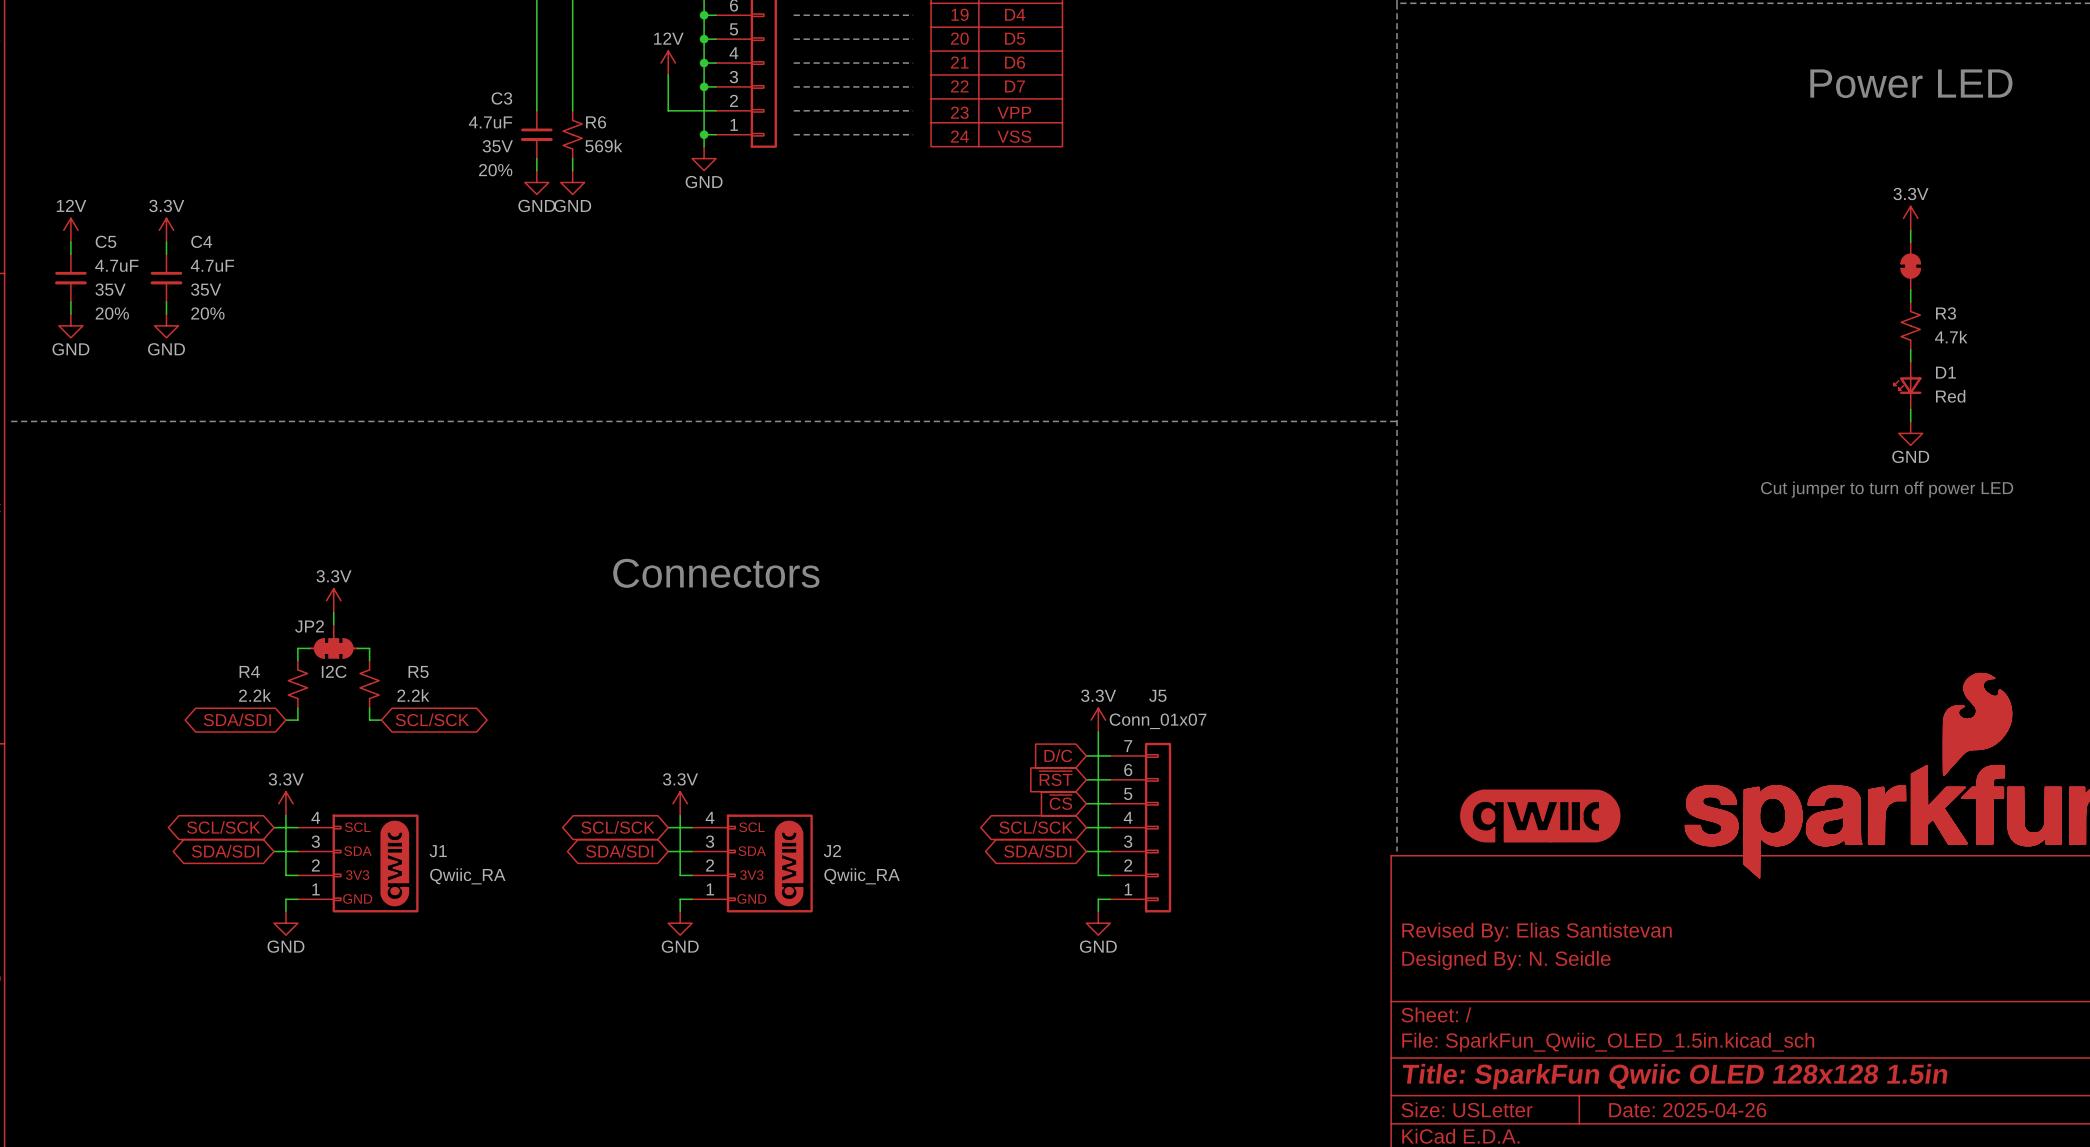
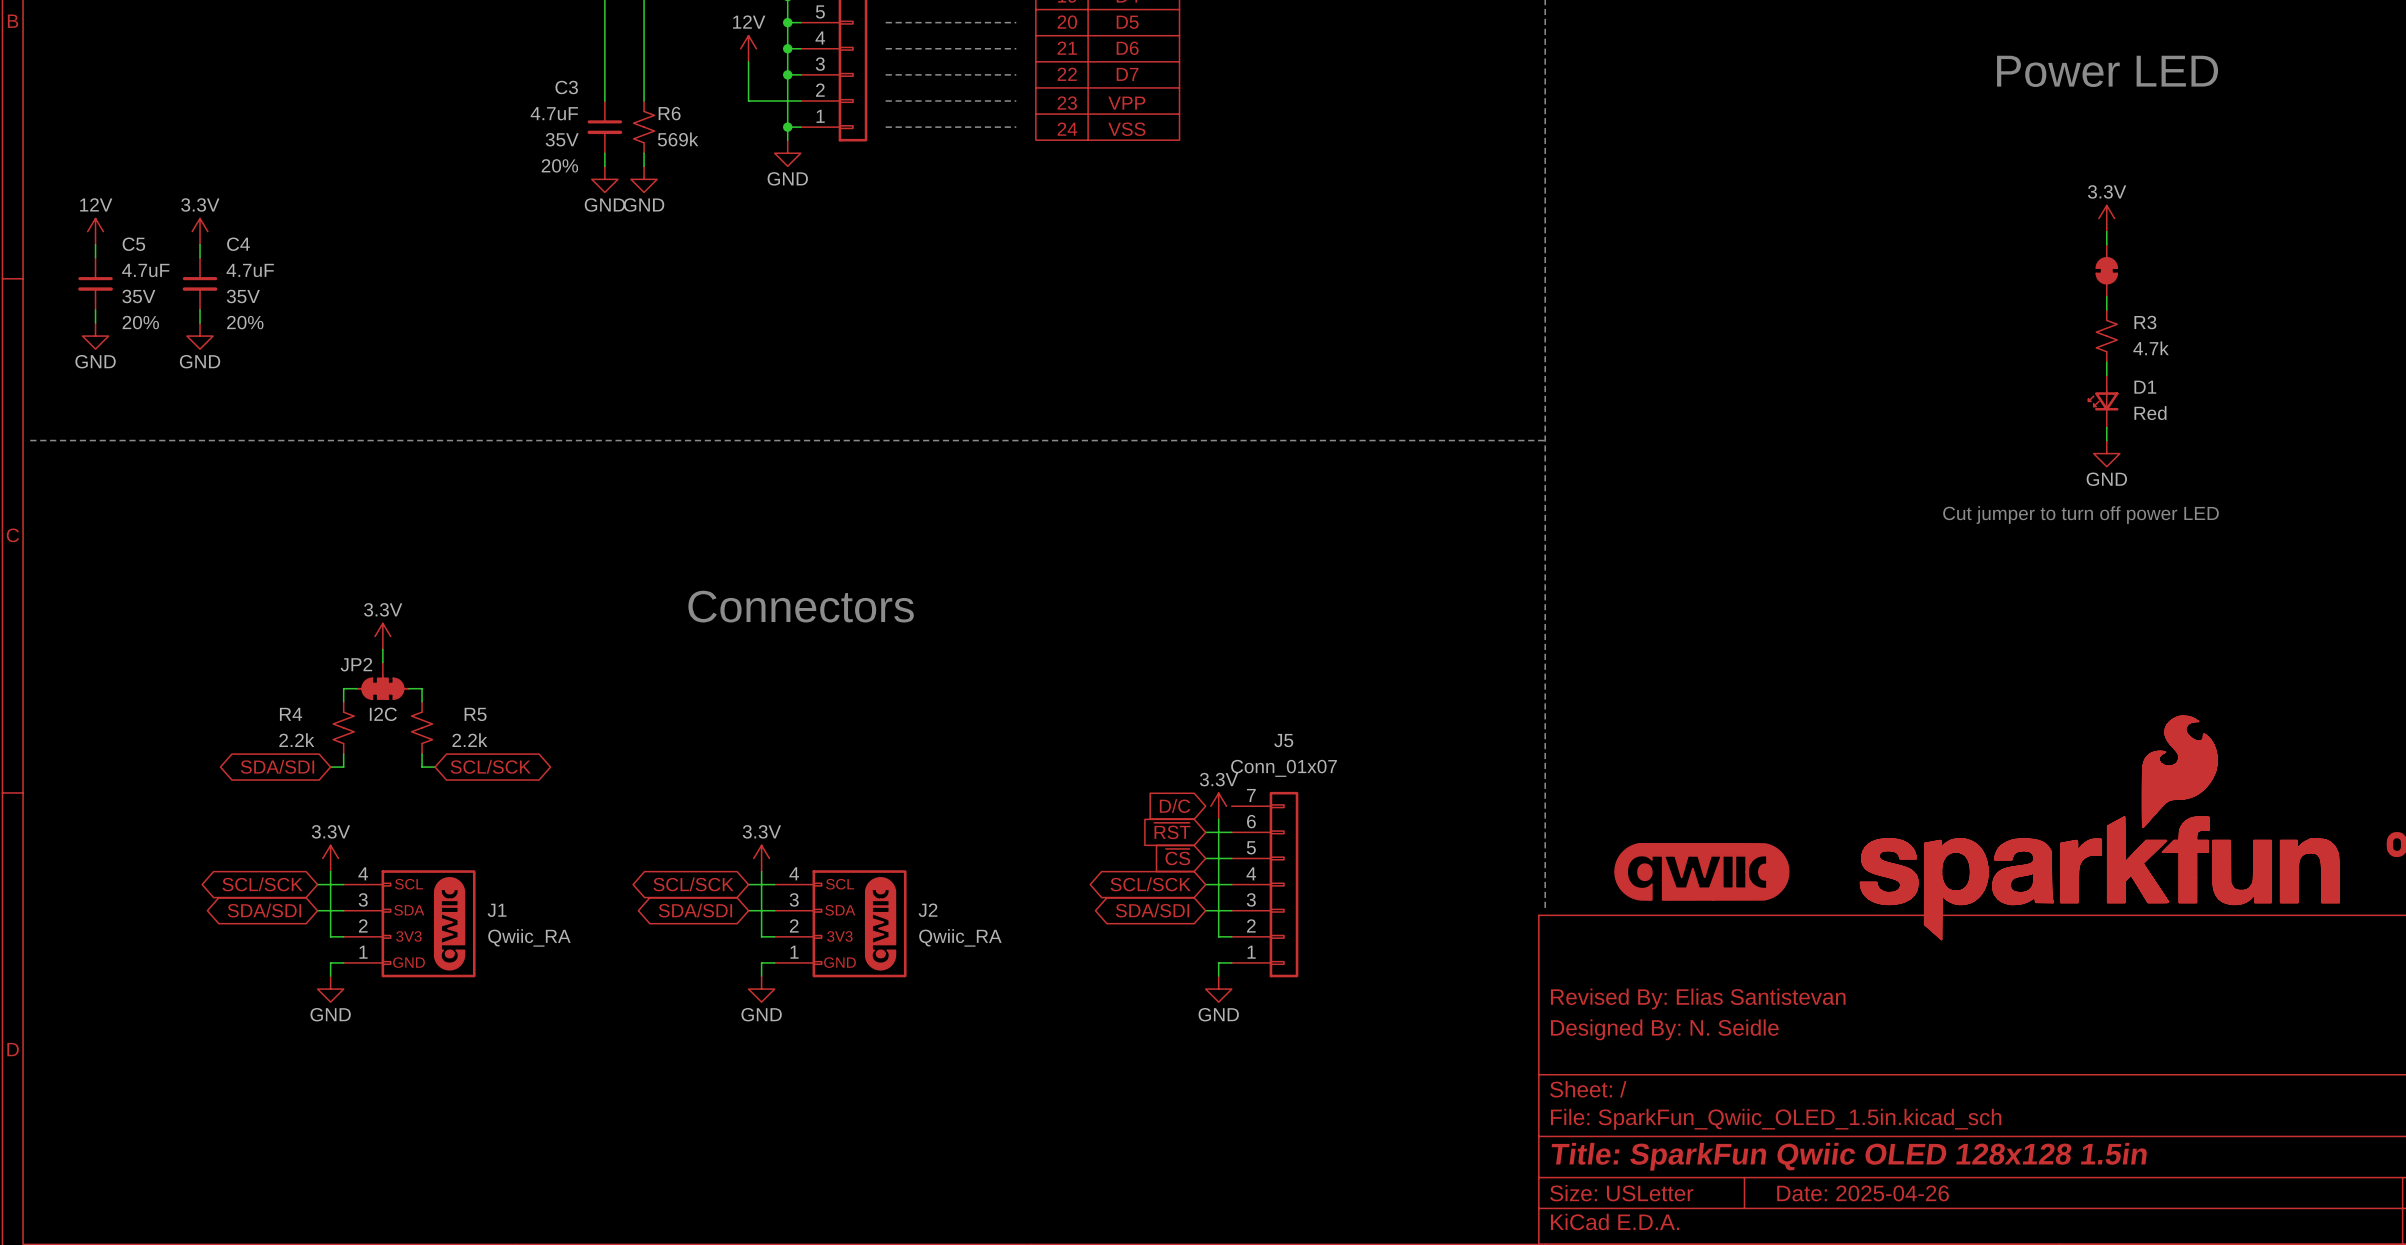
power symbol position: 3.3V (1098, 720) -> 3.3V (1218, 806)
wire: (1086, 755) (1110, 755) -> none

